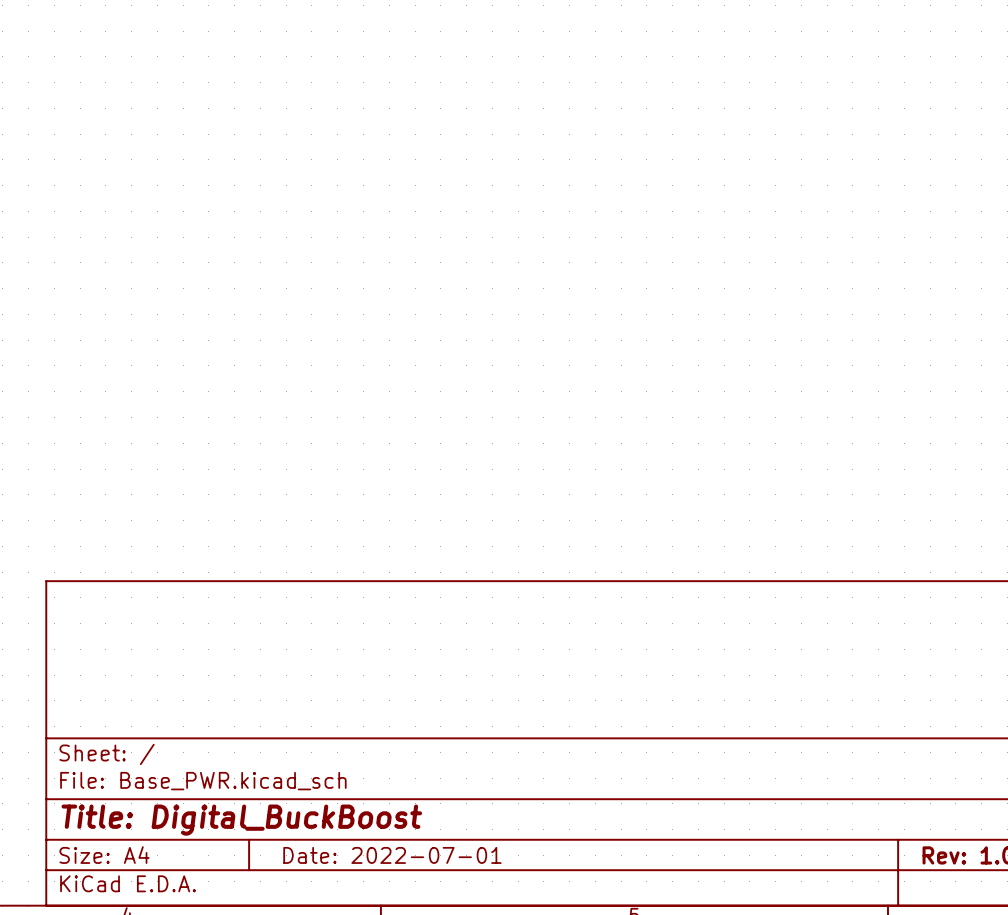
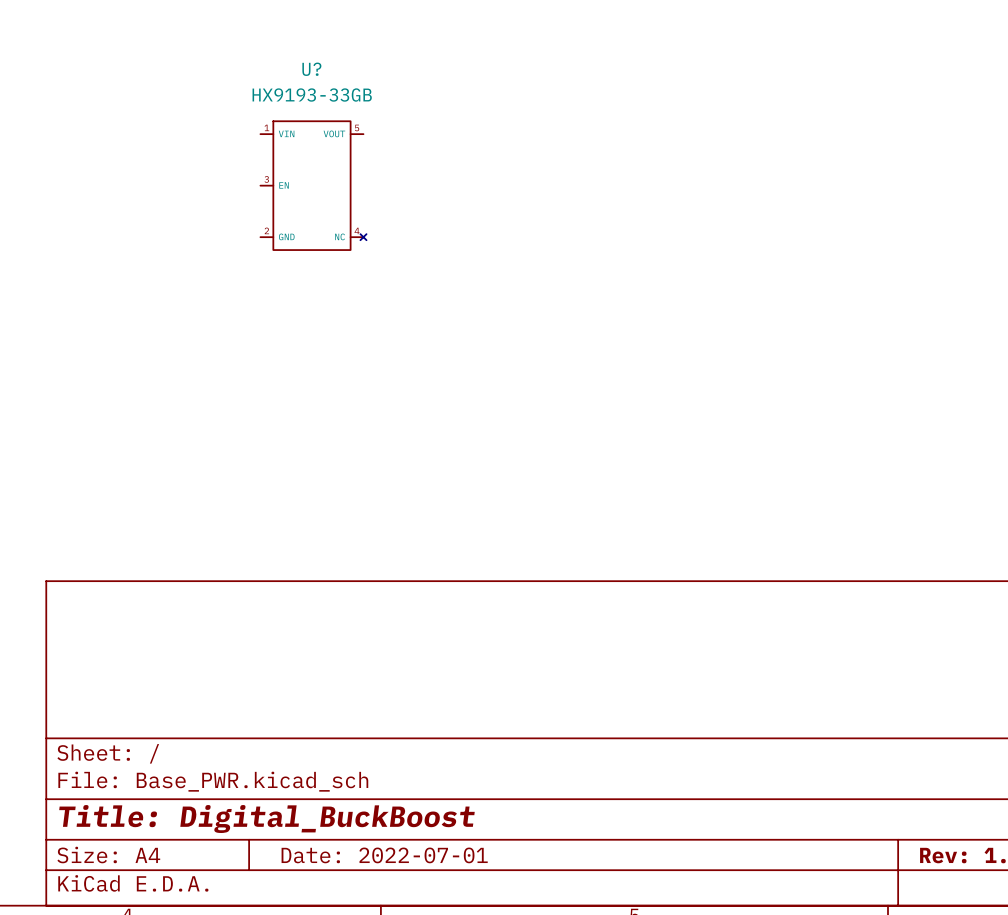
U?: none -> HX9193-33GB (313, 185)

